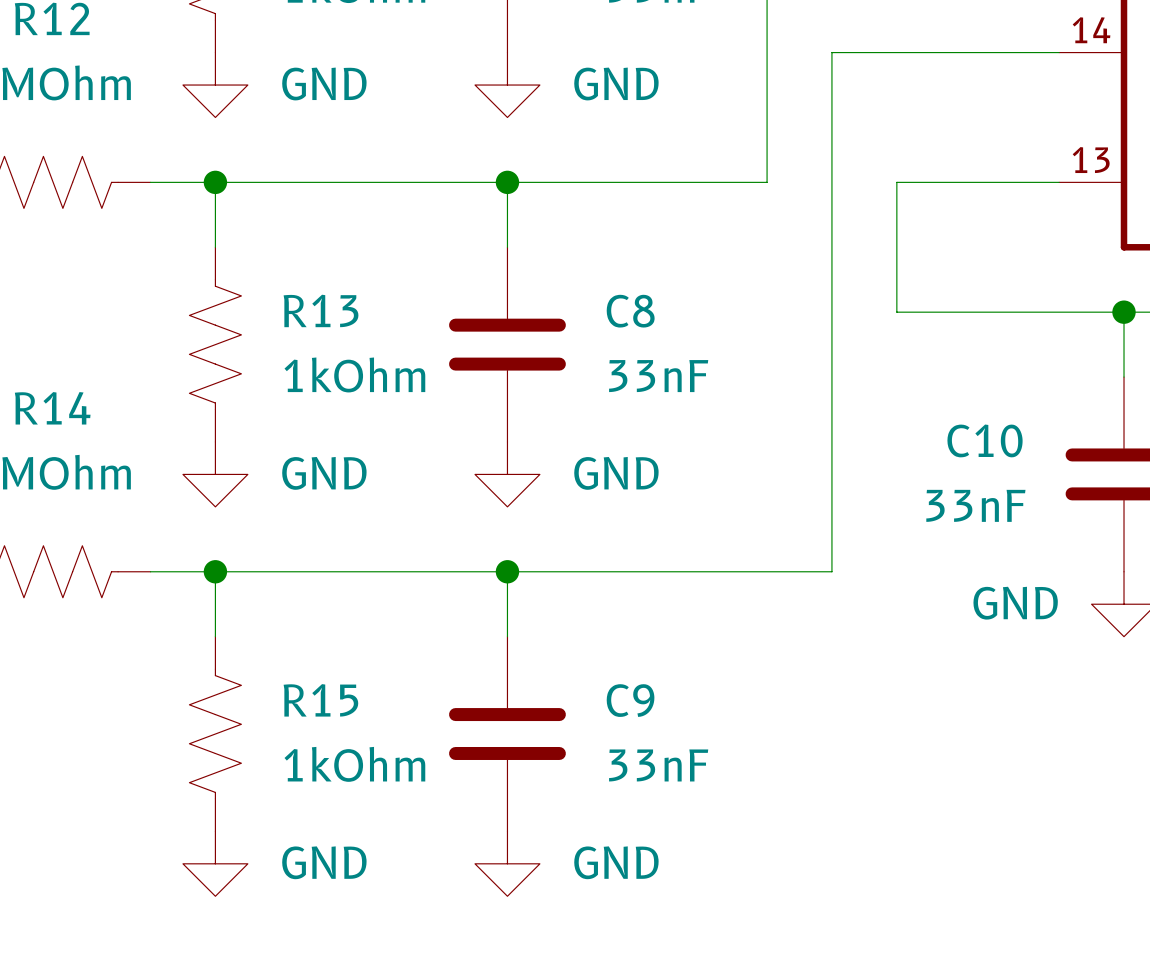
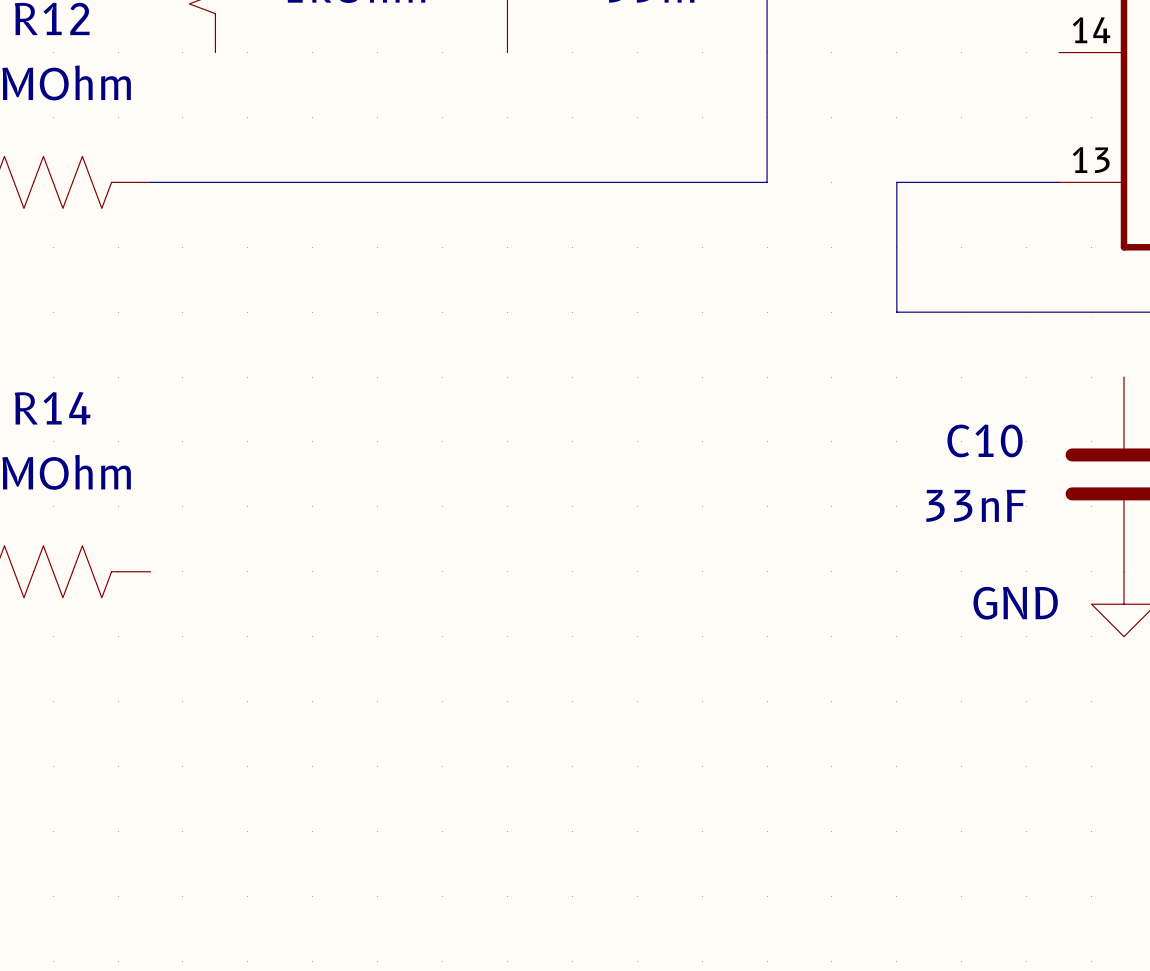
wire: (1059, 52) (831, 52) (831, 571) (150, 571) -> none
power symbol: GND (215, 85) -> none
power symbol: GND (507, 85) -> none
wire: (215, 182) (215, 247) -> none
junction: (215, 182) -> none
wire: (507, 182) (507, 247) -> none
junction: (507, 182) -> none
wire: (1124, 312) (1124, 377) -> none
junction: (1124, 312) -> none
R13: 1kOhm (215, 344) -> none
C8: 33nF (507, 344) -> none
power symbol: GND (215, 474) -> none
power symbol: GND (507, 474) -> none
wire: (215, 571) (215, 636) -> none
junction: (215, 571) -> none
wire: (507, 571) (507, 636) -> none
junction: (507, 571) -> none
R15: 1kOhm (215, 734) -> none
C9: 33nF (507, 734) -> none
power symbol: GND (215, 863) -> none
power symbol: GND (507, 863) -> none

